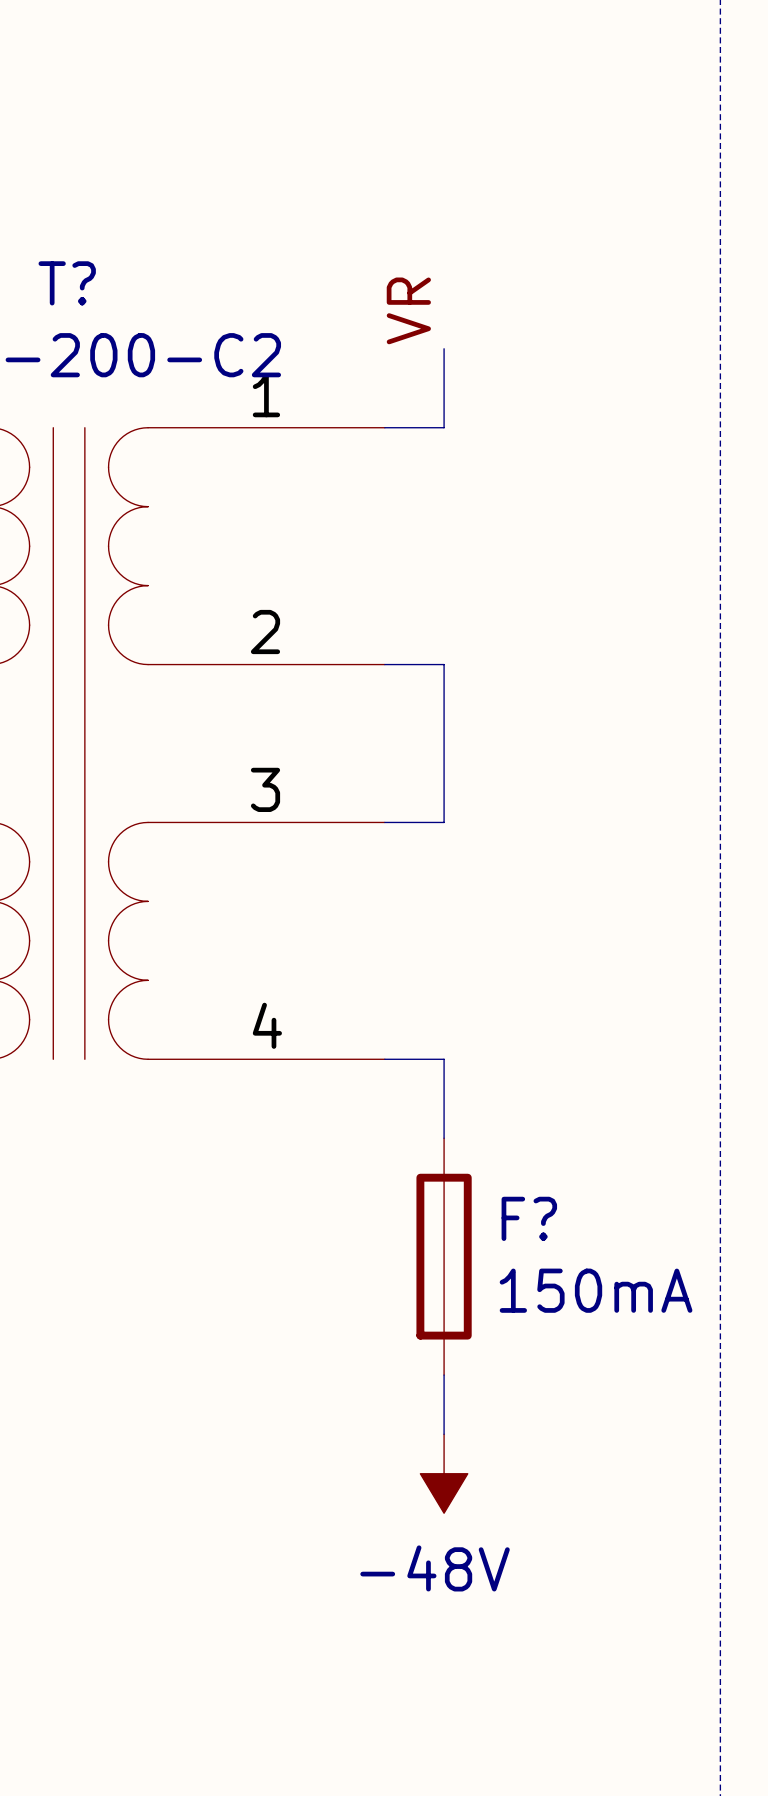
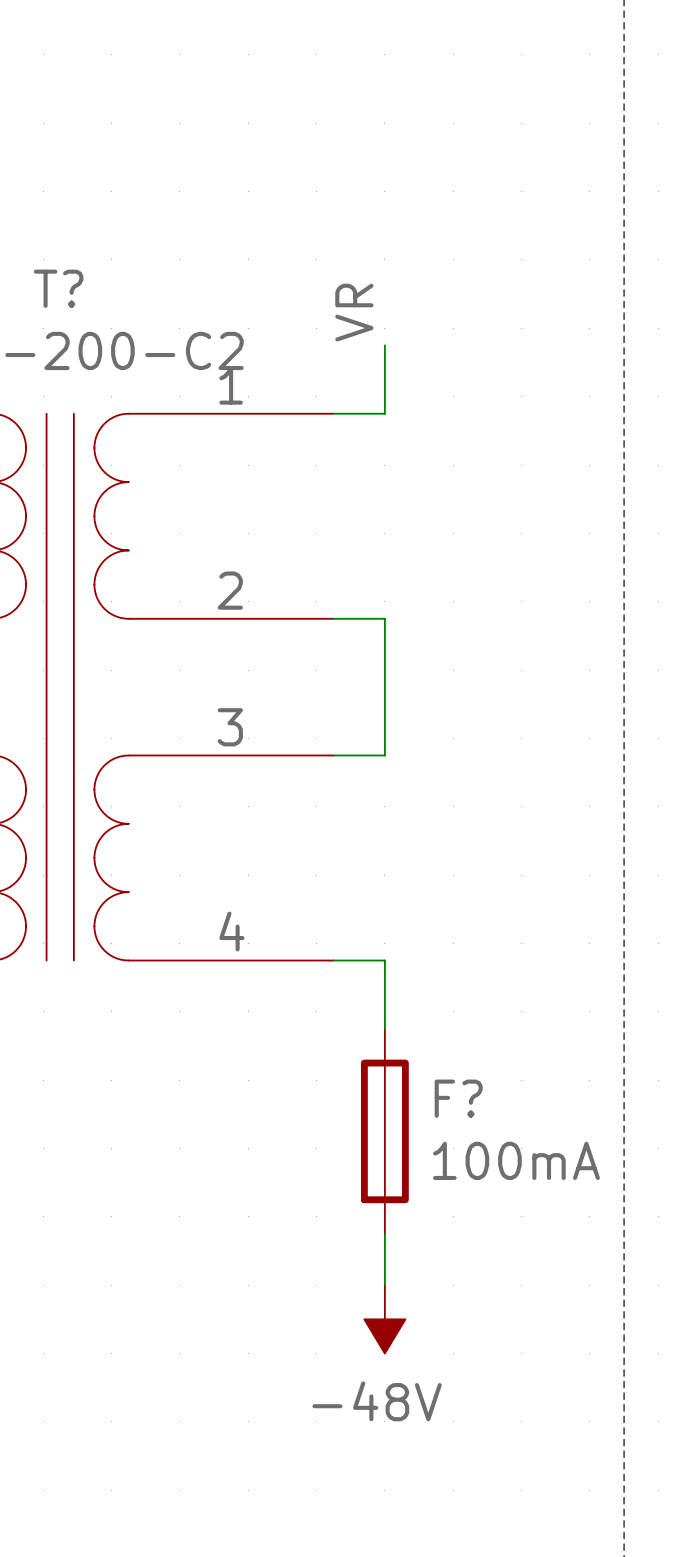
F? value: 150mA (596, 1290) -> 100mA (516, 1160)

